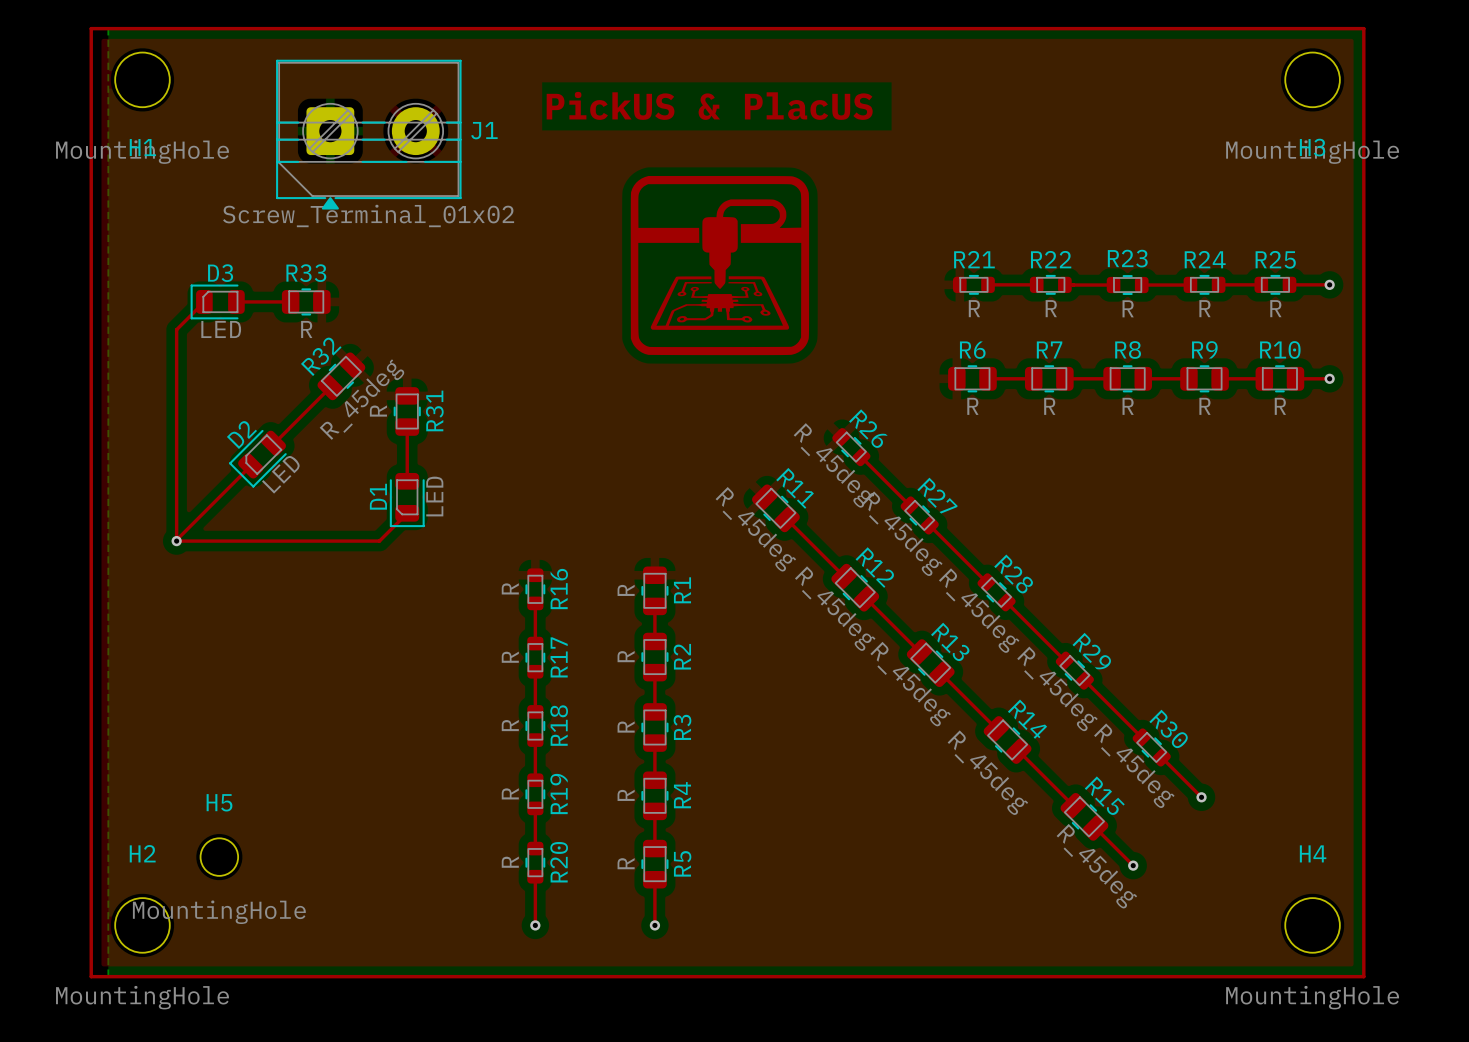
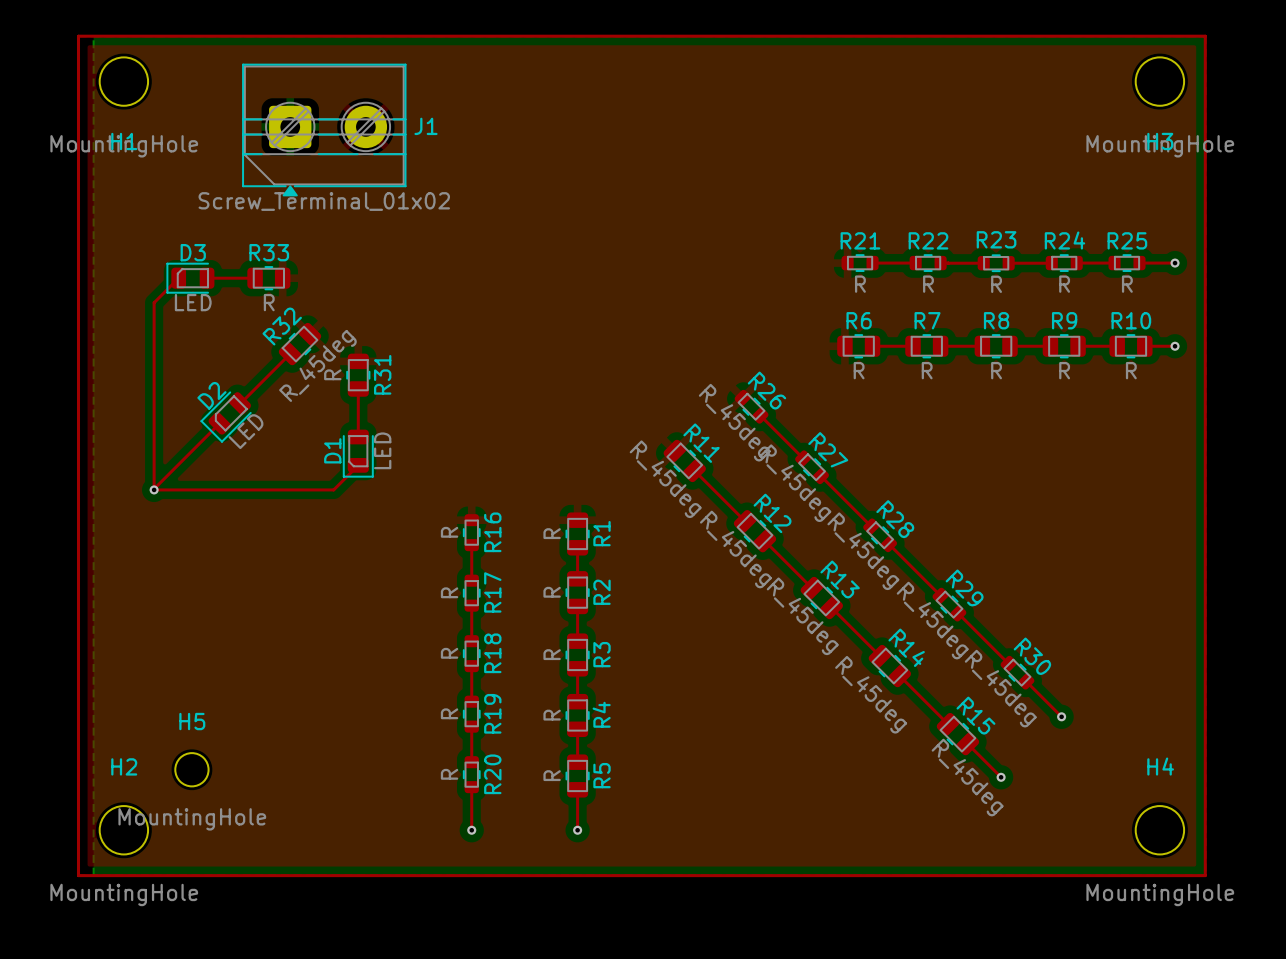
text: PickUS & PlacUS (709, 105) -> none
drawing: [630, 175, 810, 356] -> none

